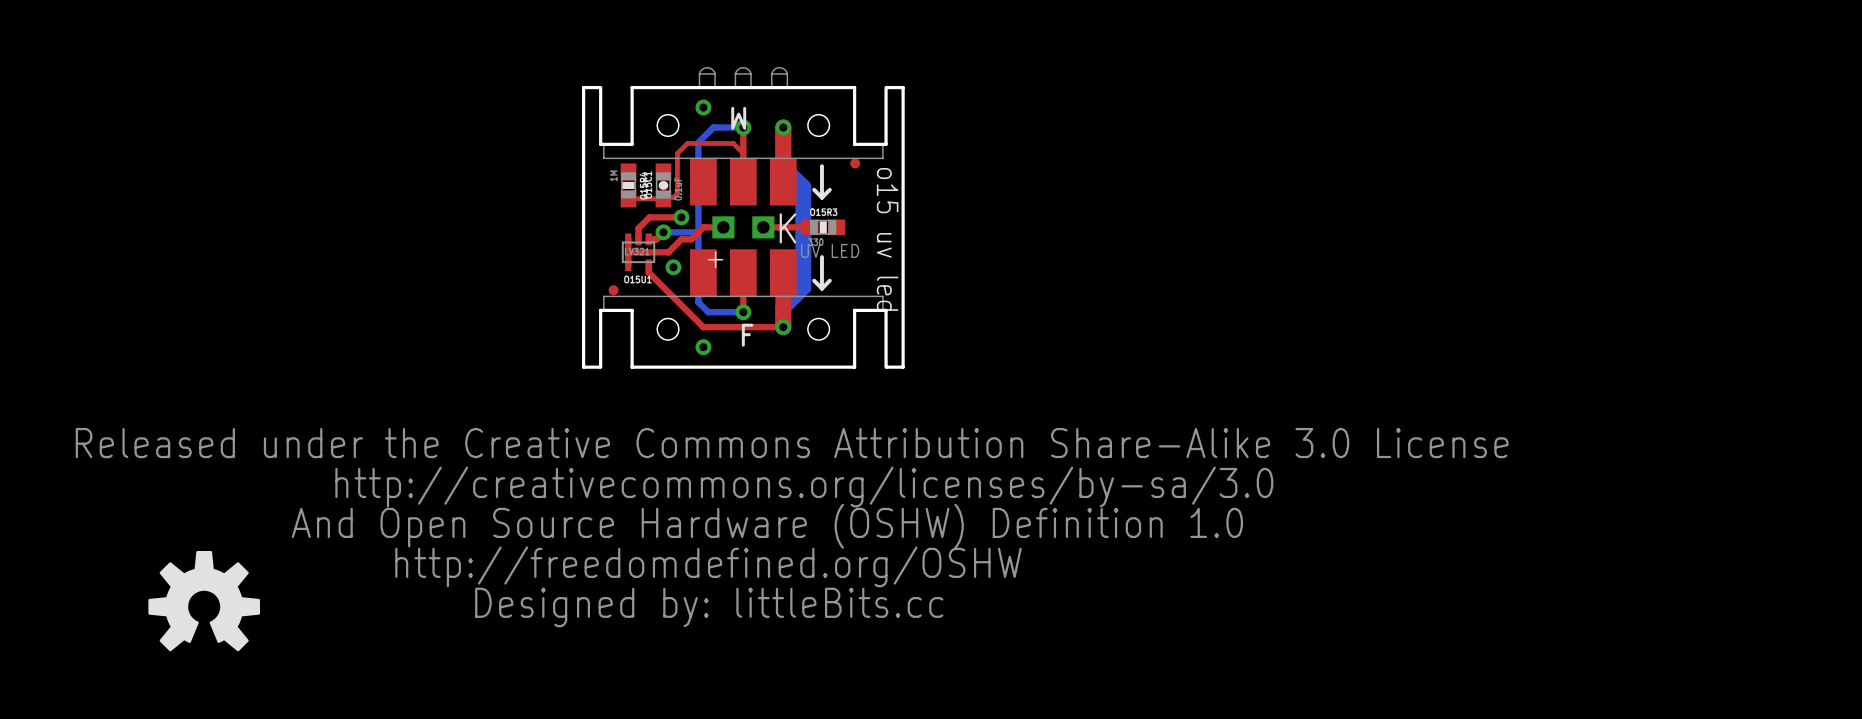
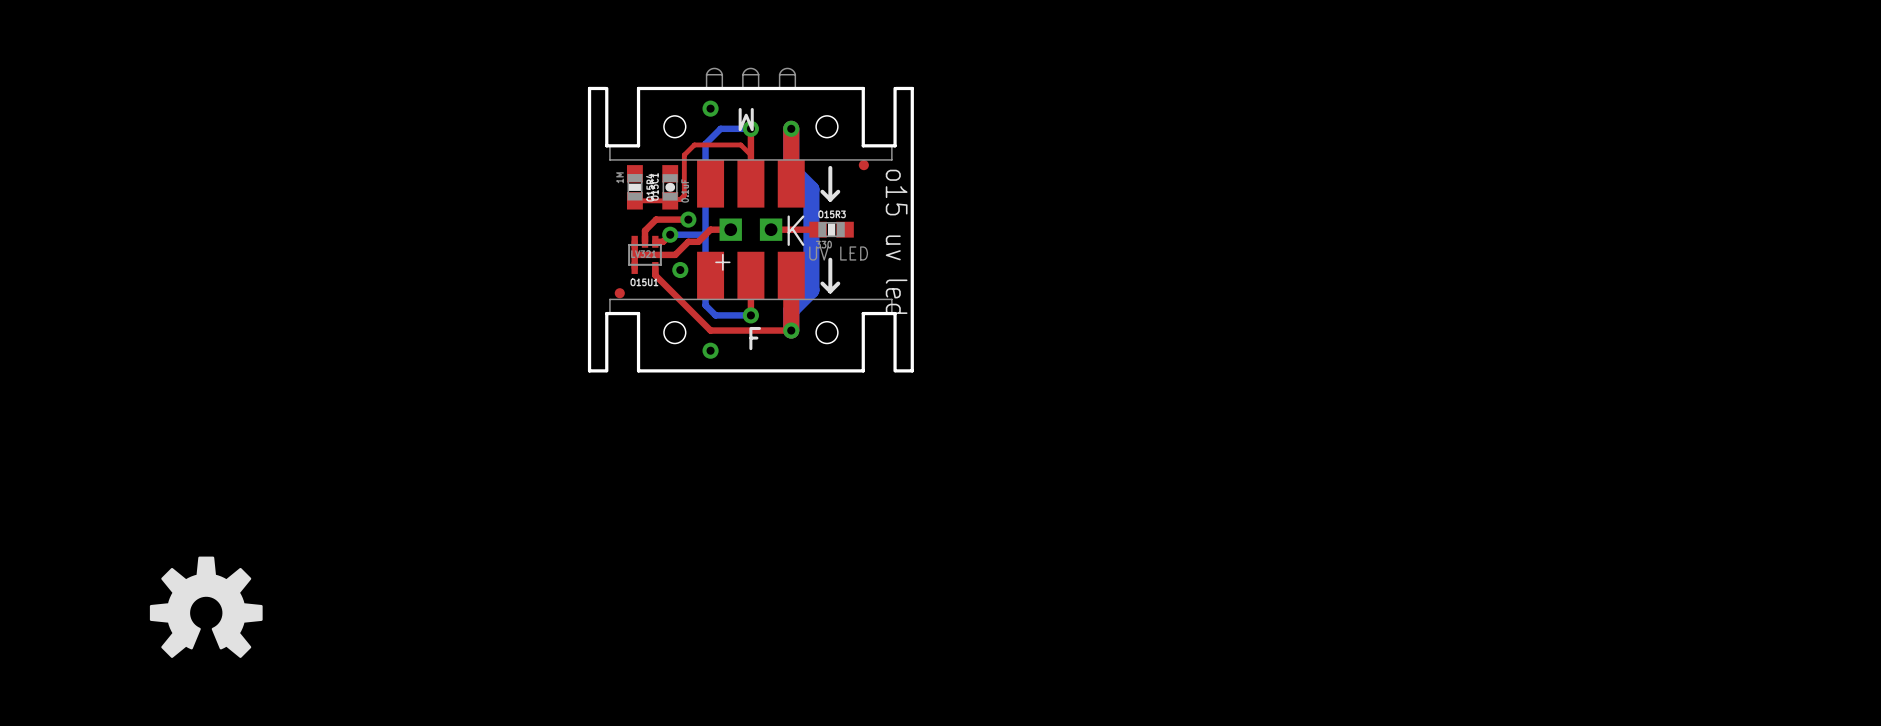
drawing: [75, 427, 1509, 628] -> none

